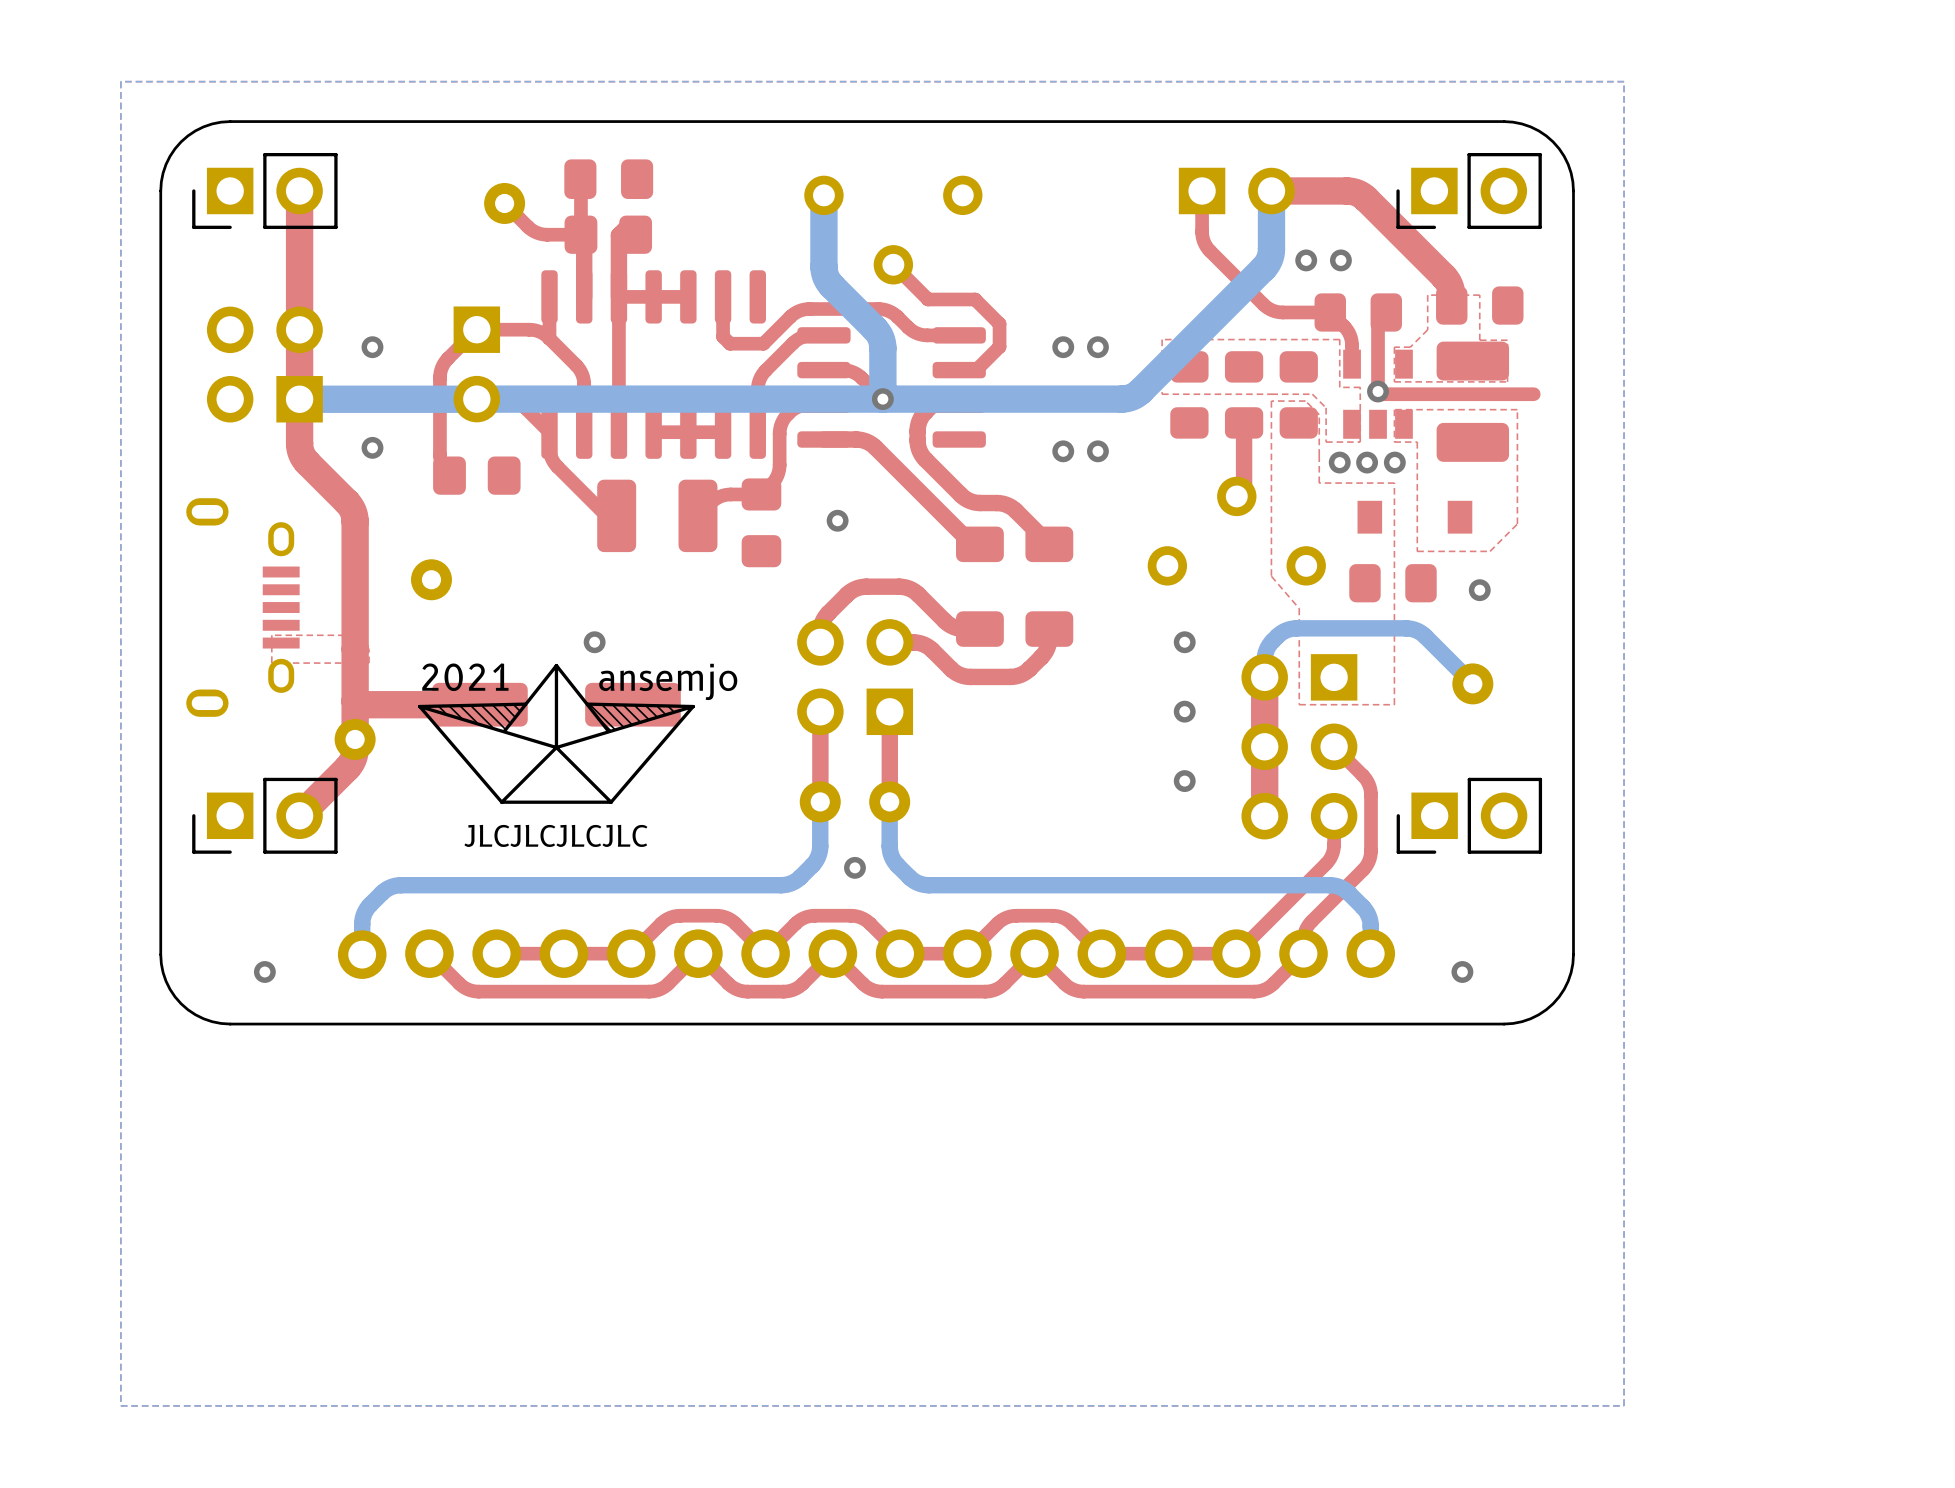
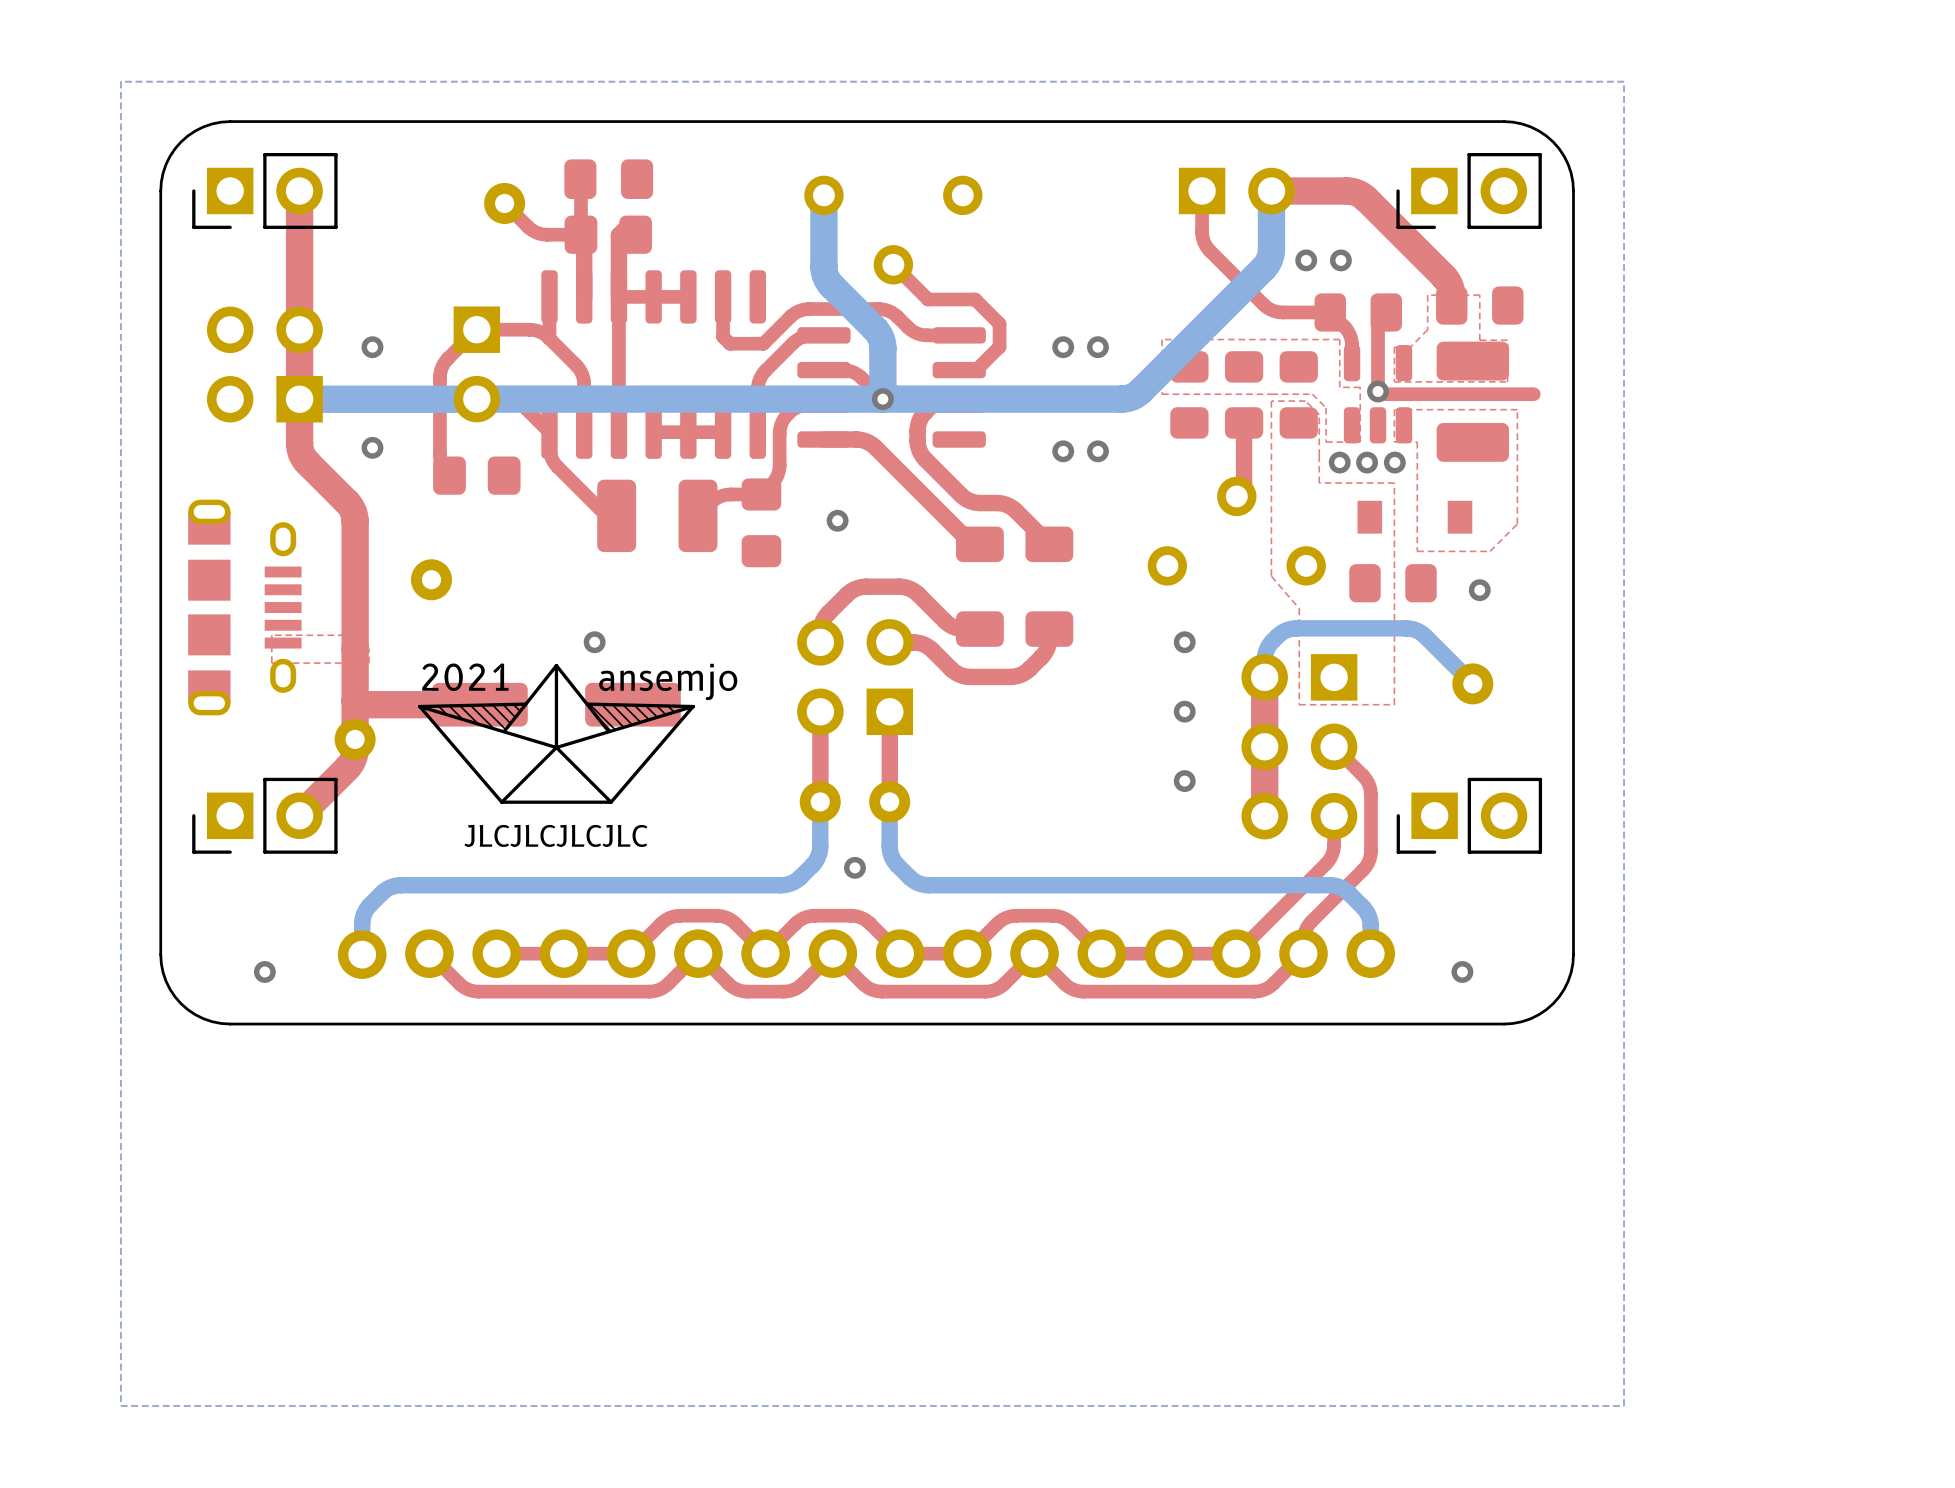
part footprint: [1343, 349, 1413, 439] -> [1343, 345, 1413, 444]
part footprint: [186, 498, 300, 717] -> [188, 499, 302, 716]

